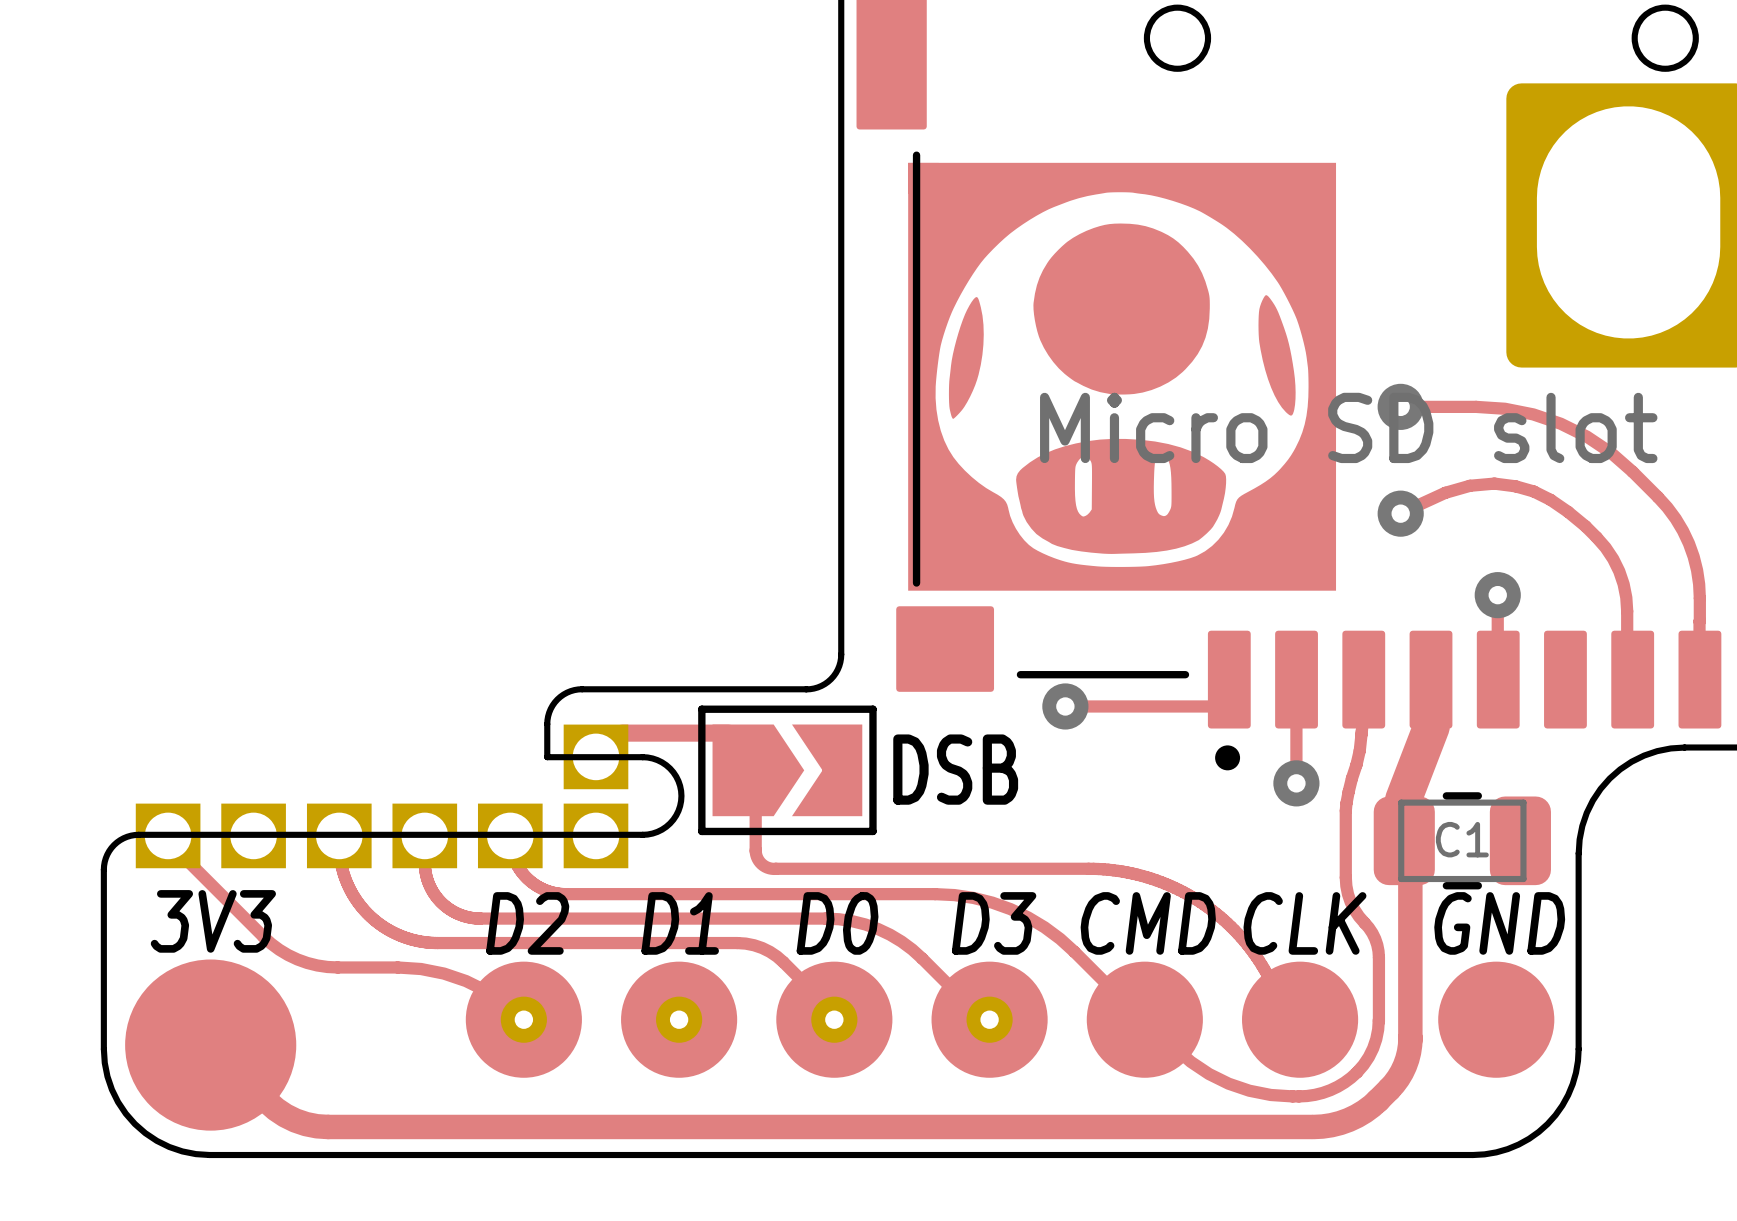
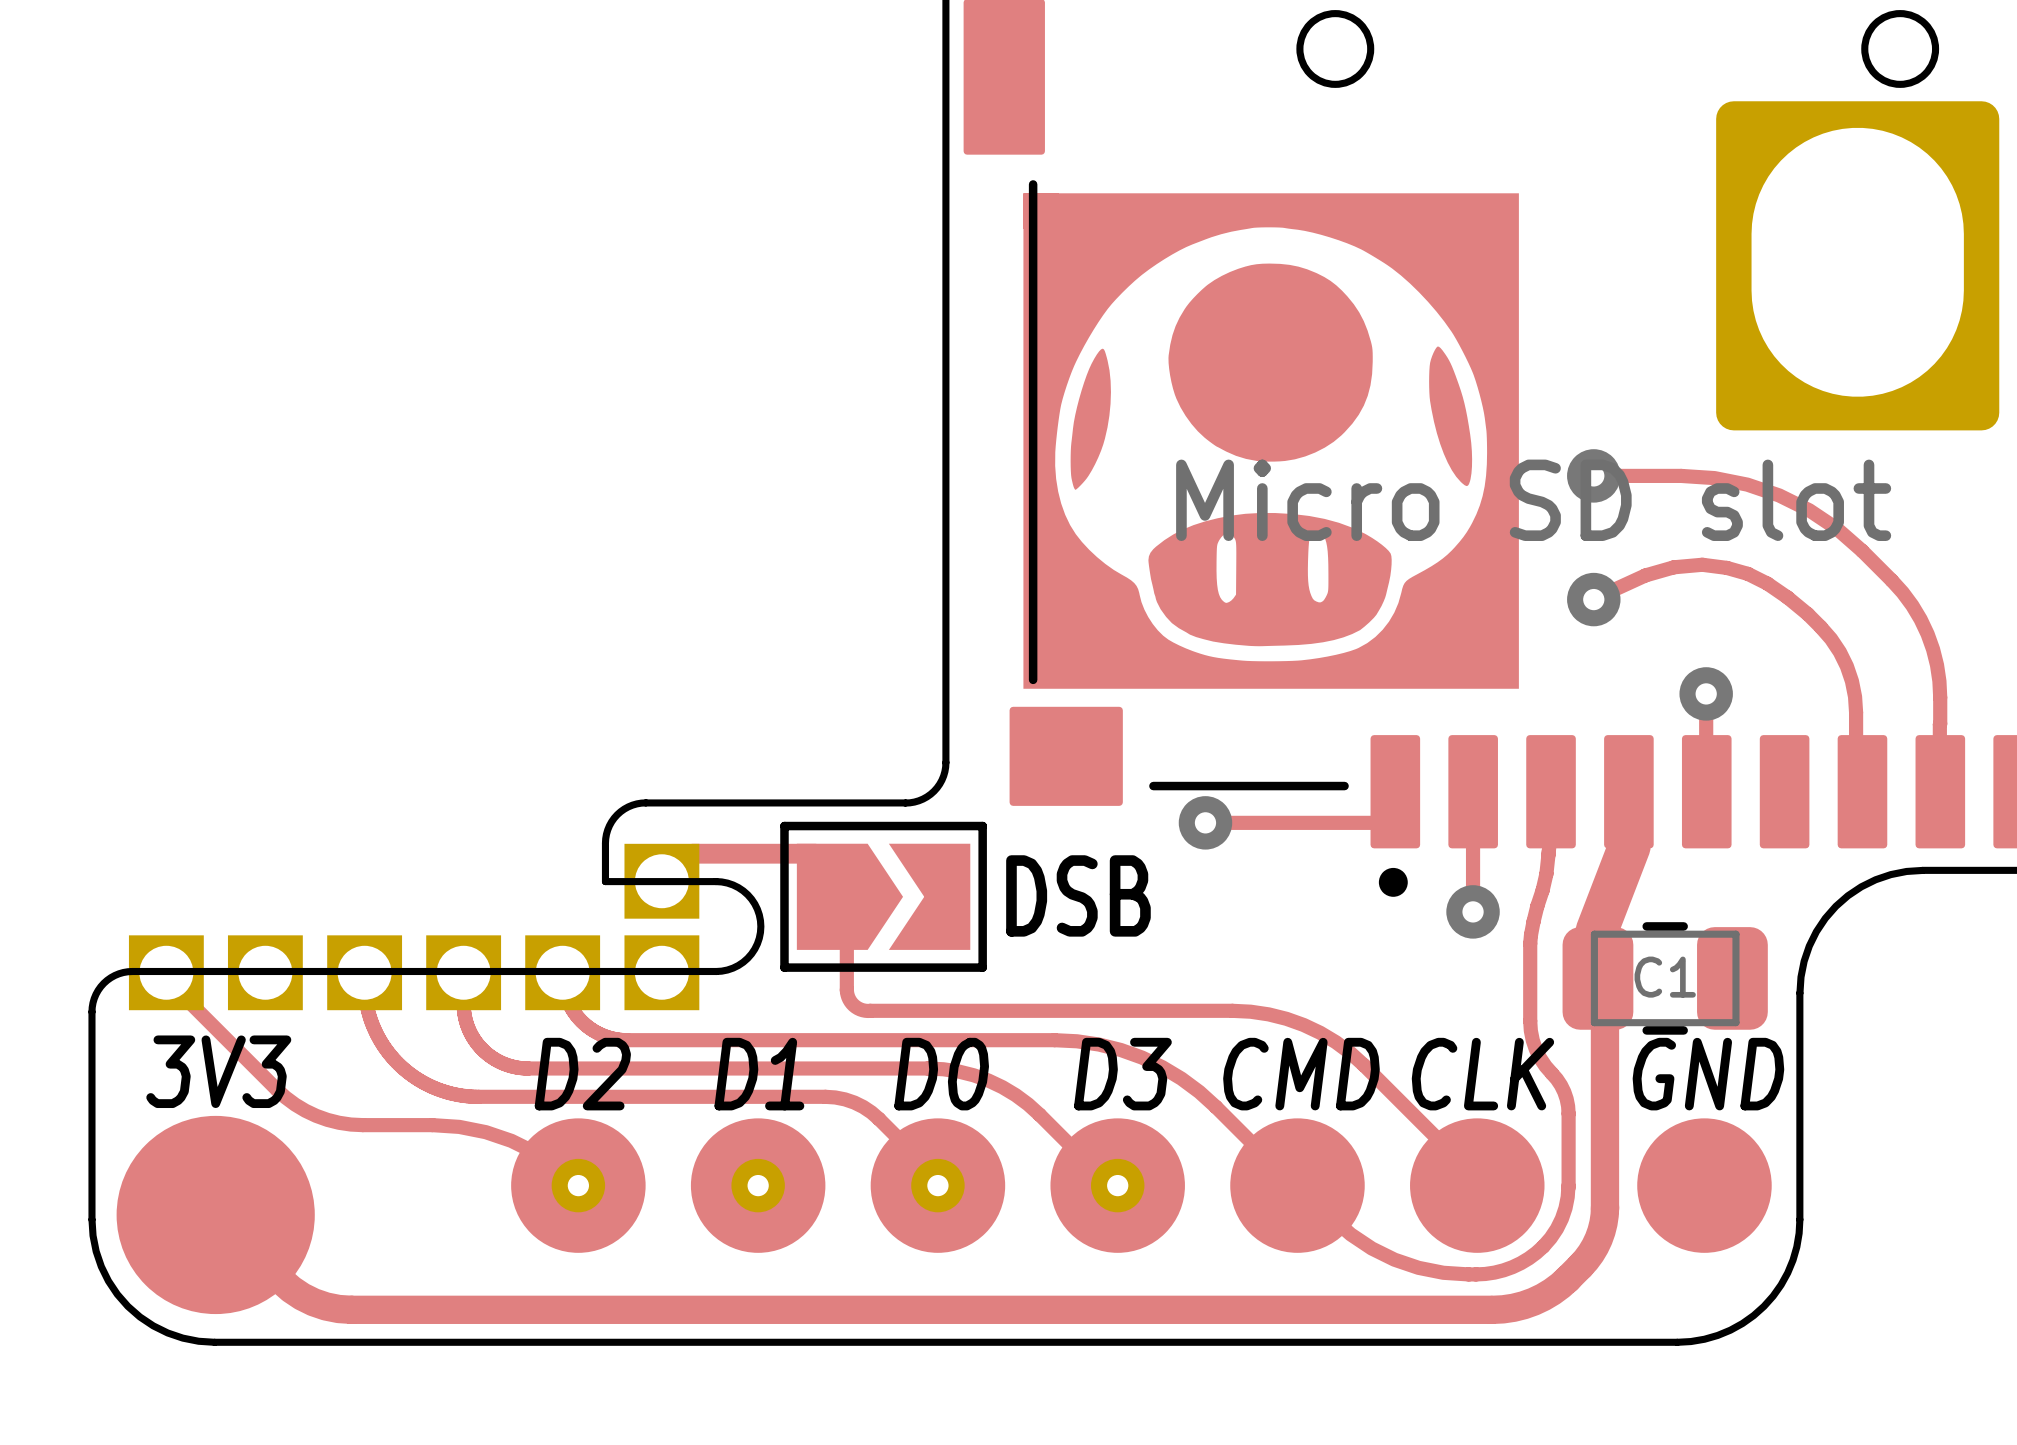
track: (1088, 868) (1118, 870) (1146, 877) (1174, 887) (1196, 899) (1220, 916) (1237, 933) (1256, 956) (1271, 982) -> (1232, 1010) (1250, 1011) (1286, 1018) (1303, 1024) (1335, 1042) (1364, 1065) (1472, 1173)

